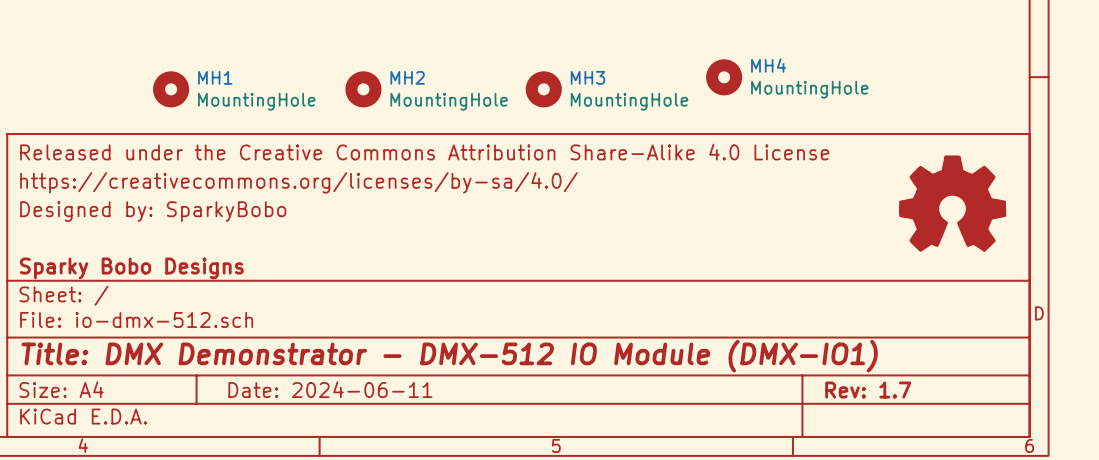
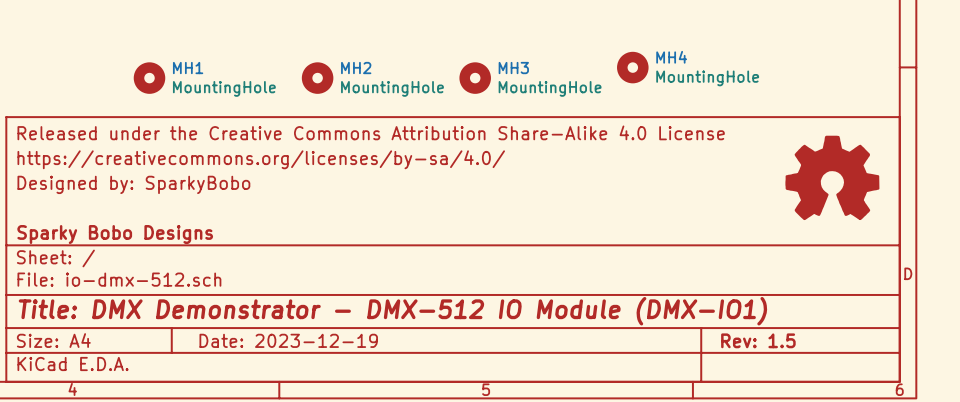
title block: Date: 2024-06-11 (330, 389) -> Date: 2023-12-19 (288, 340)
title block: Rev: 1.7 (868, 390) -> Rev: 1.5 (758, 340)

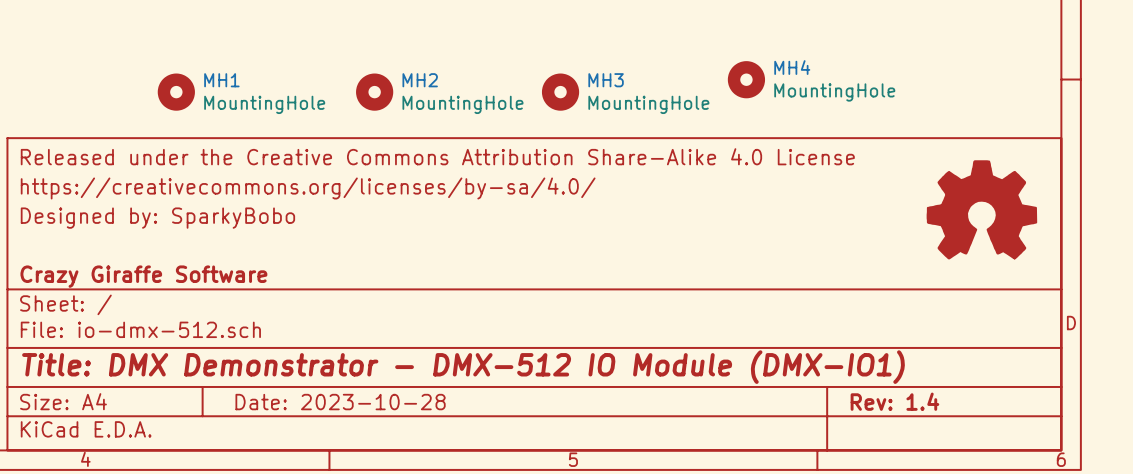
title block: Sparky Bobo Designs (115, 234) -> Crazy Giraffe Software (143, 276)
title block: Date: 2023-12-19 (288, 340) -> Date: 2023-10-28 (340, 402)
title block: Rev: 1.5 (758, 340) -> Rev: 1.4 (894, 401)

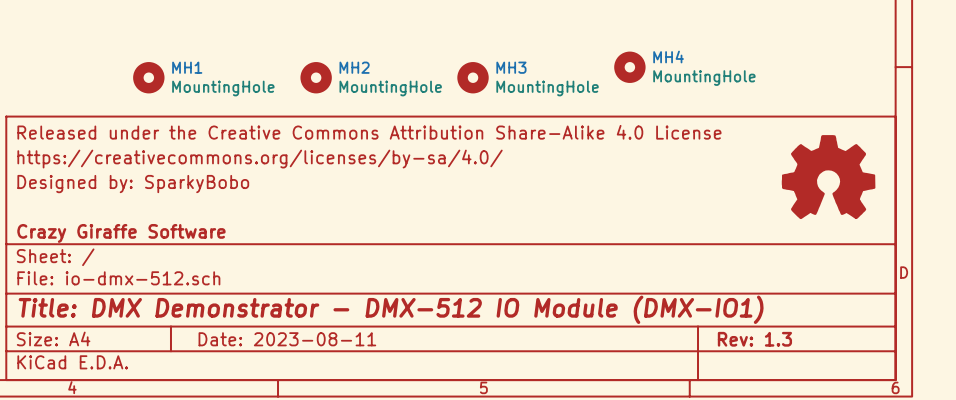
title block: Rev: 1.4 (894, 401) -> Rev: 1.3 (754, 339)
title block: Date: 2023-10-28 (340, 402) -> Date: 2023-08-11 (287, 339)

